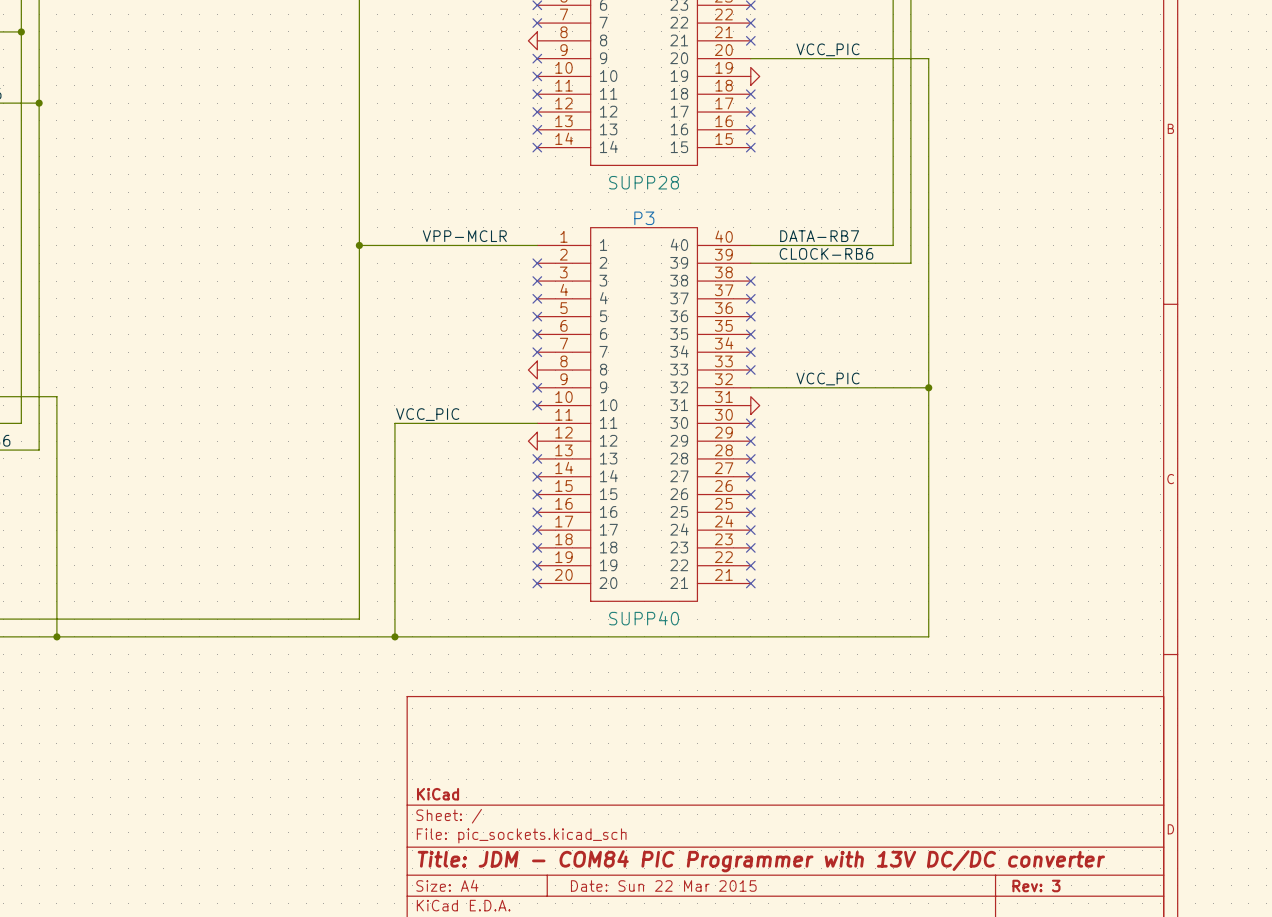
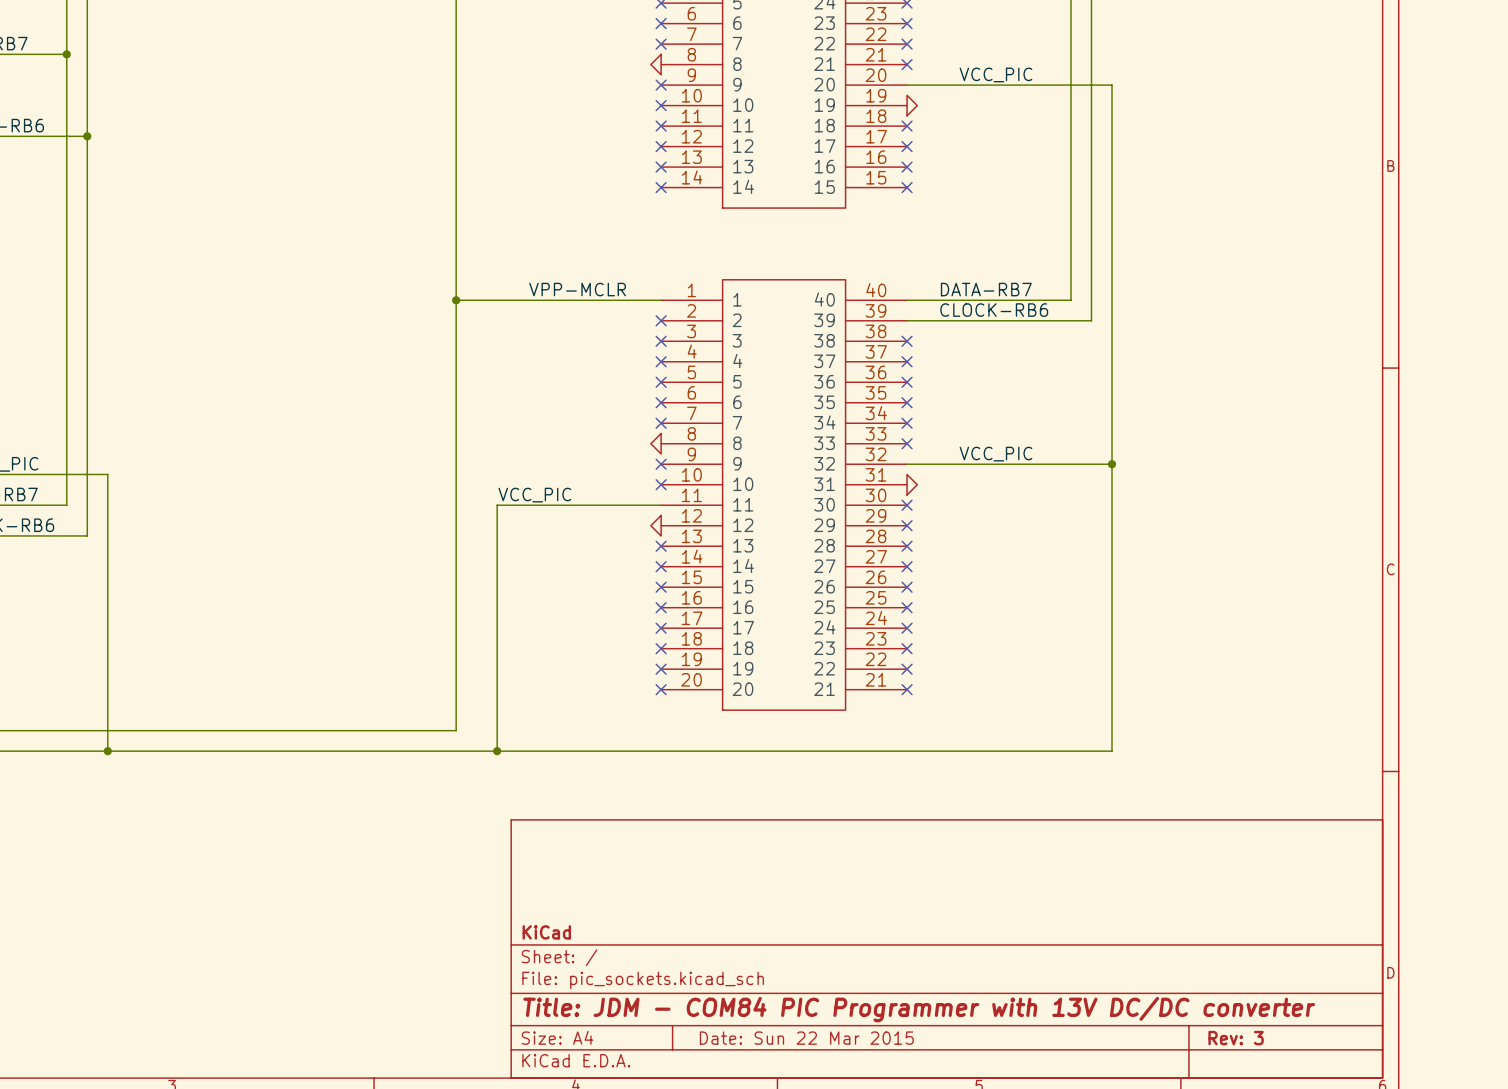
part value: SUPP28 (644, 182) -> none
P3 name: P3 (644, 218) -> none
P3 value: SUPP40 (644, 618) -> none

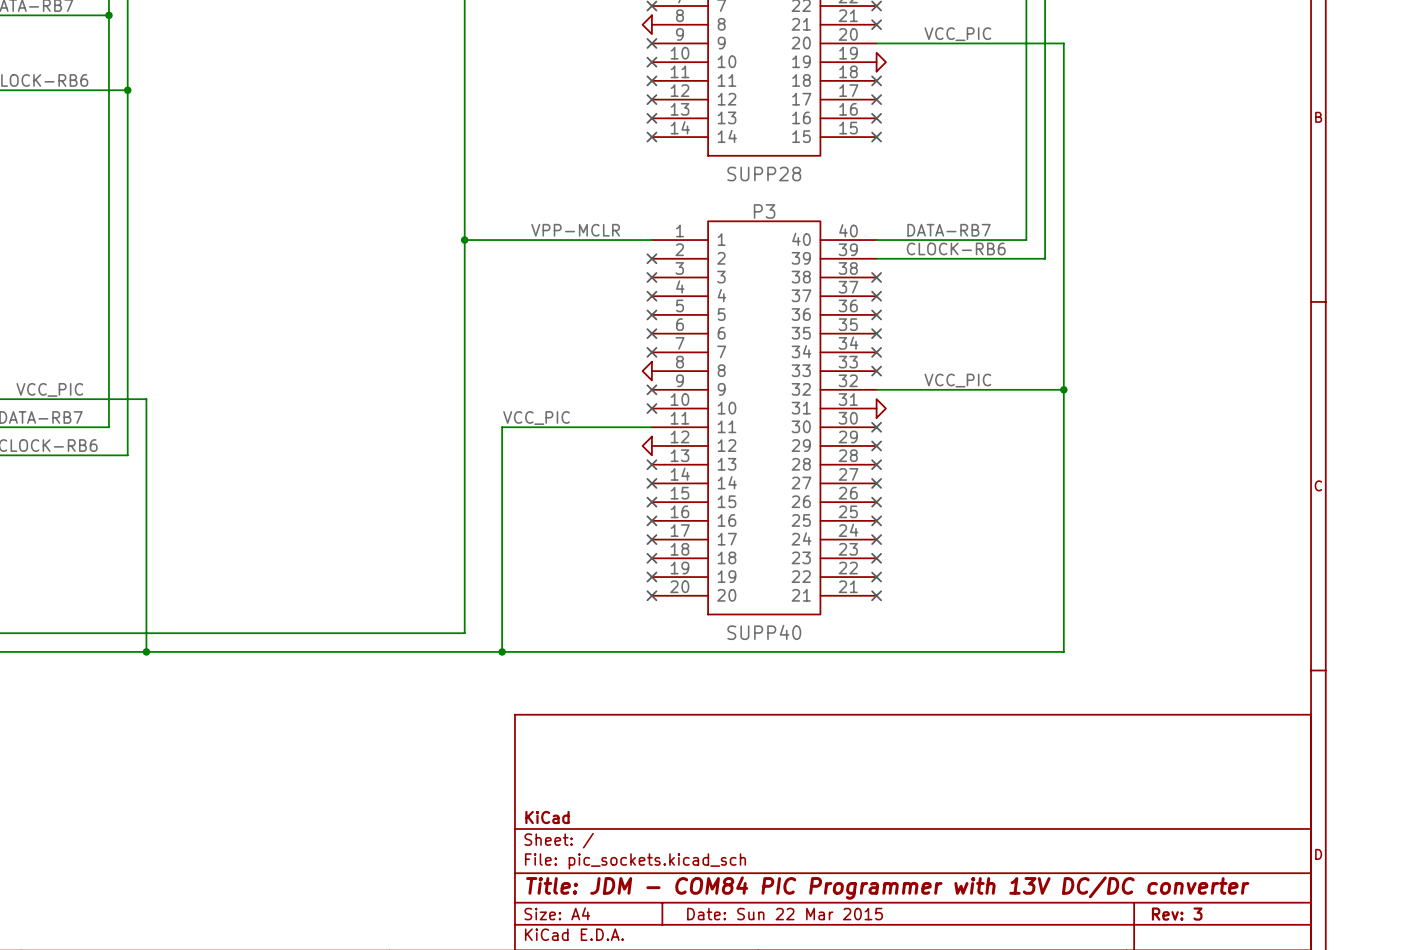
part value: none -> SUPP28 (764, 174)
P3 name: none -> P3 (764, 211)
P3 value: none -> SUPP40 (764, 632)

